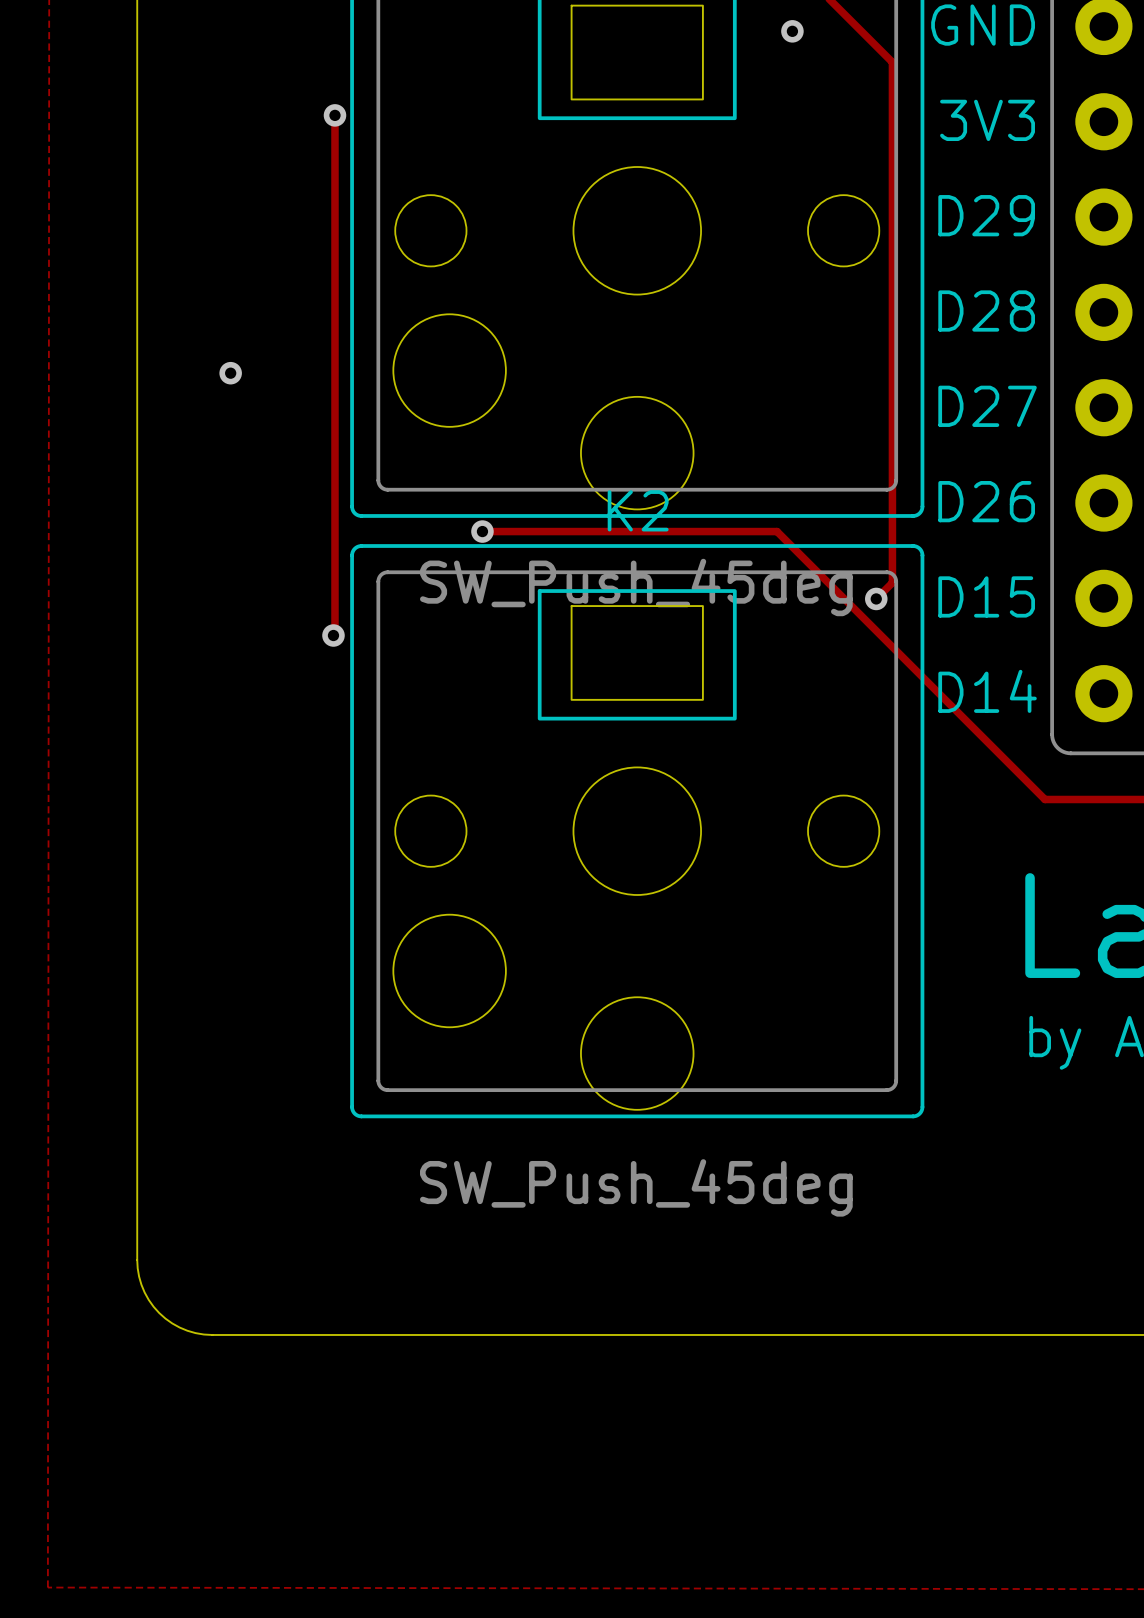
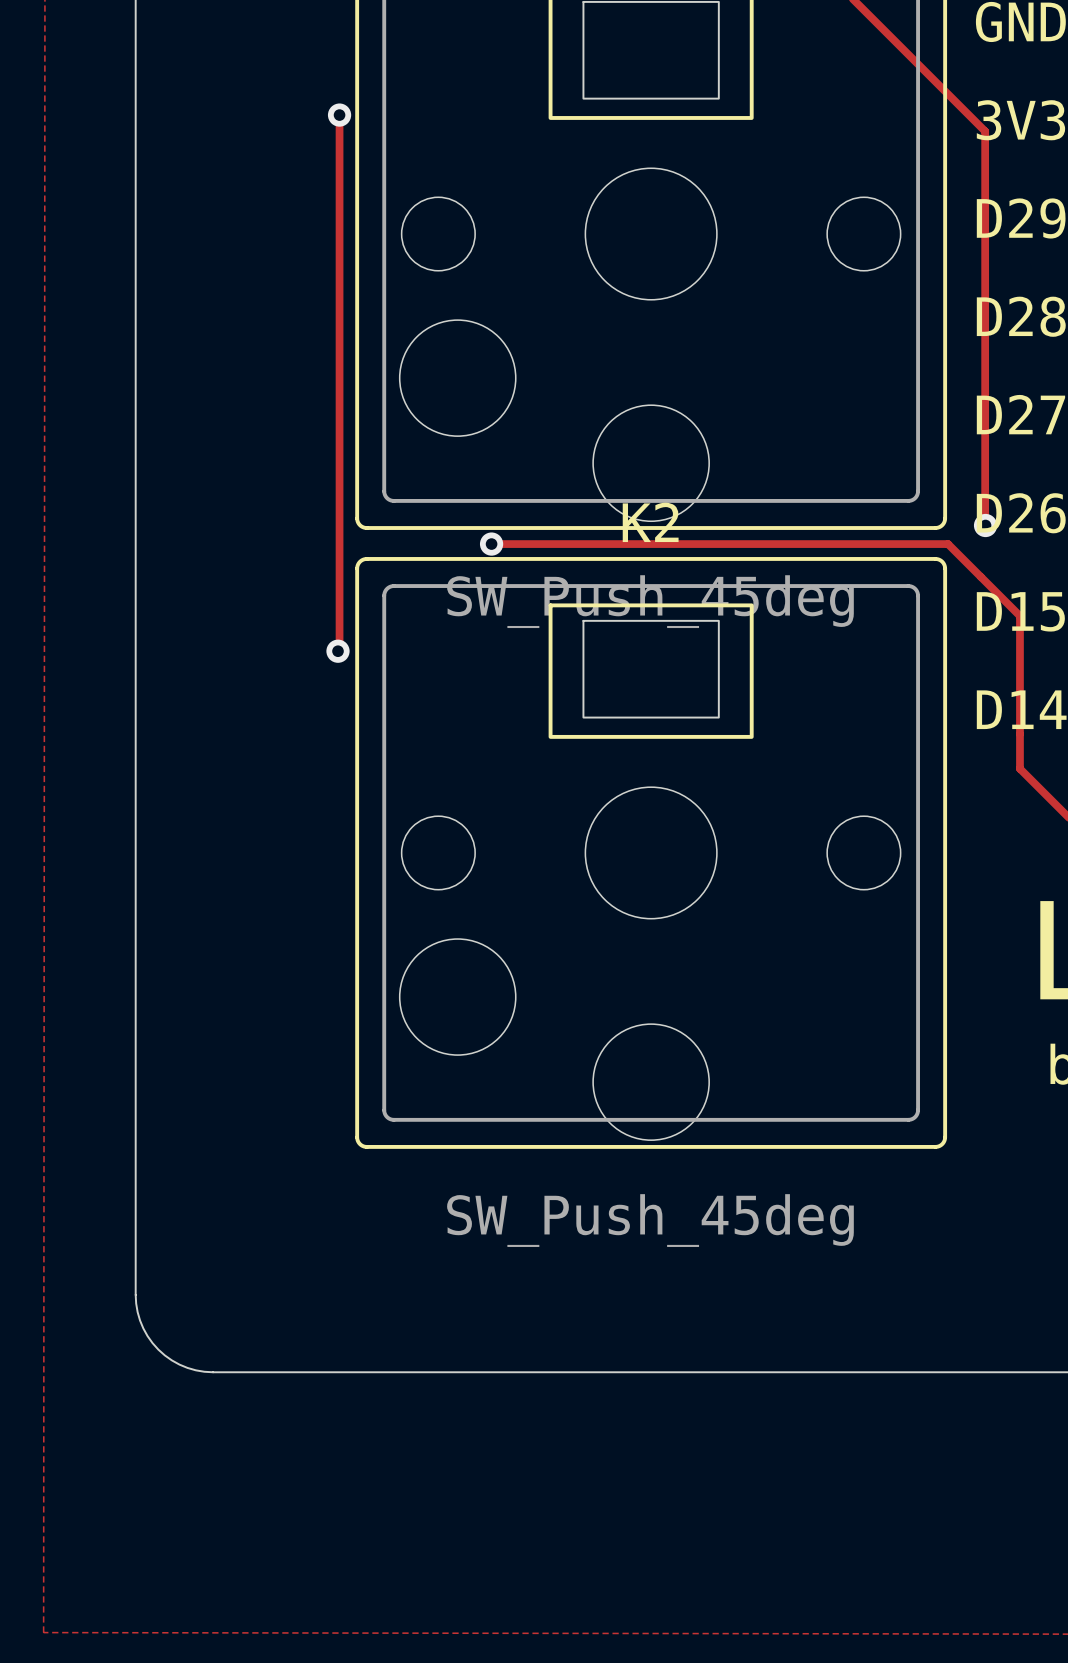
via: (792, 31) -> none
track: (892, 62) (892, 582) (876, 598) -> (914, 60) (985, 131) (985, 525)
via: (230, 373) -> none
track: (777, 531) (995, 749) -> (795, 544) (948, 544) (1019, 616) (1019, 768)
via position: (876, 598) -> (985, 525)

